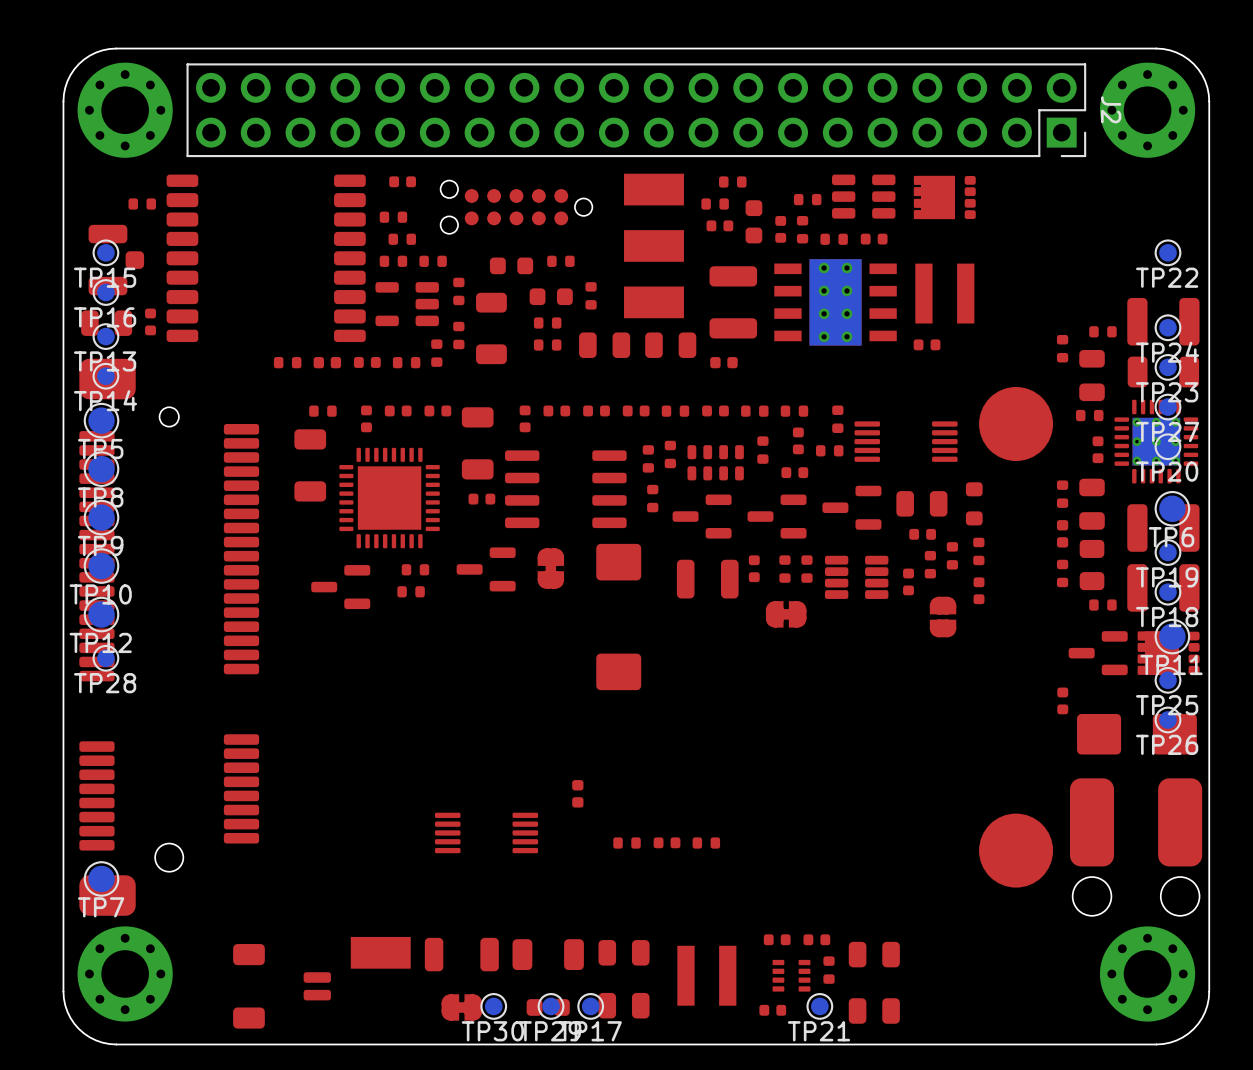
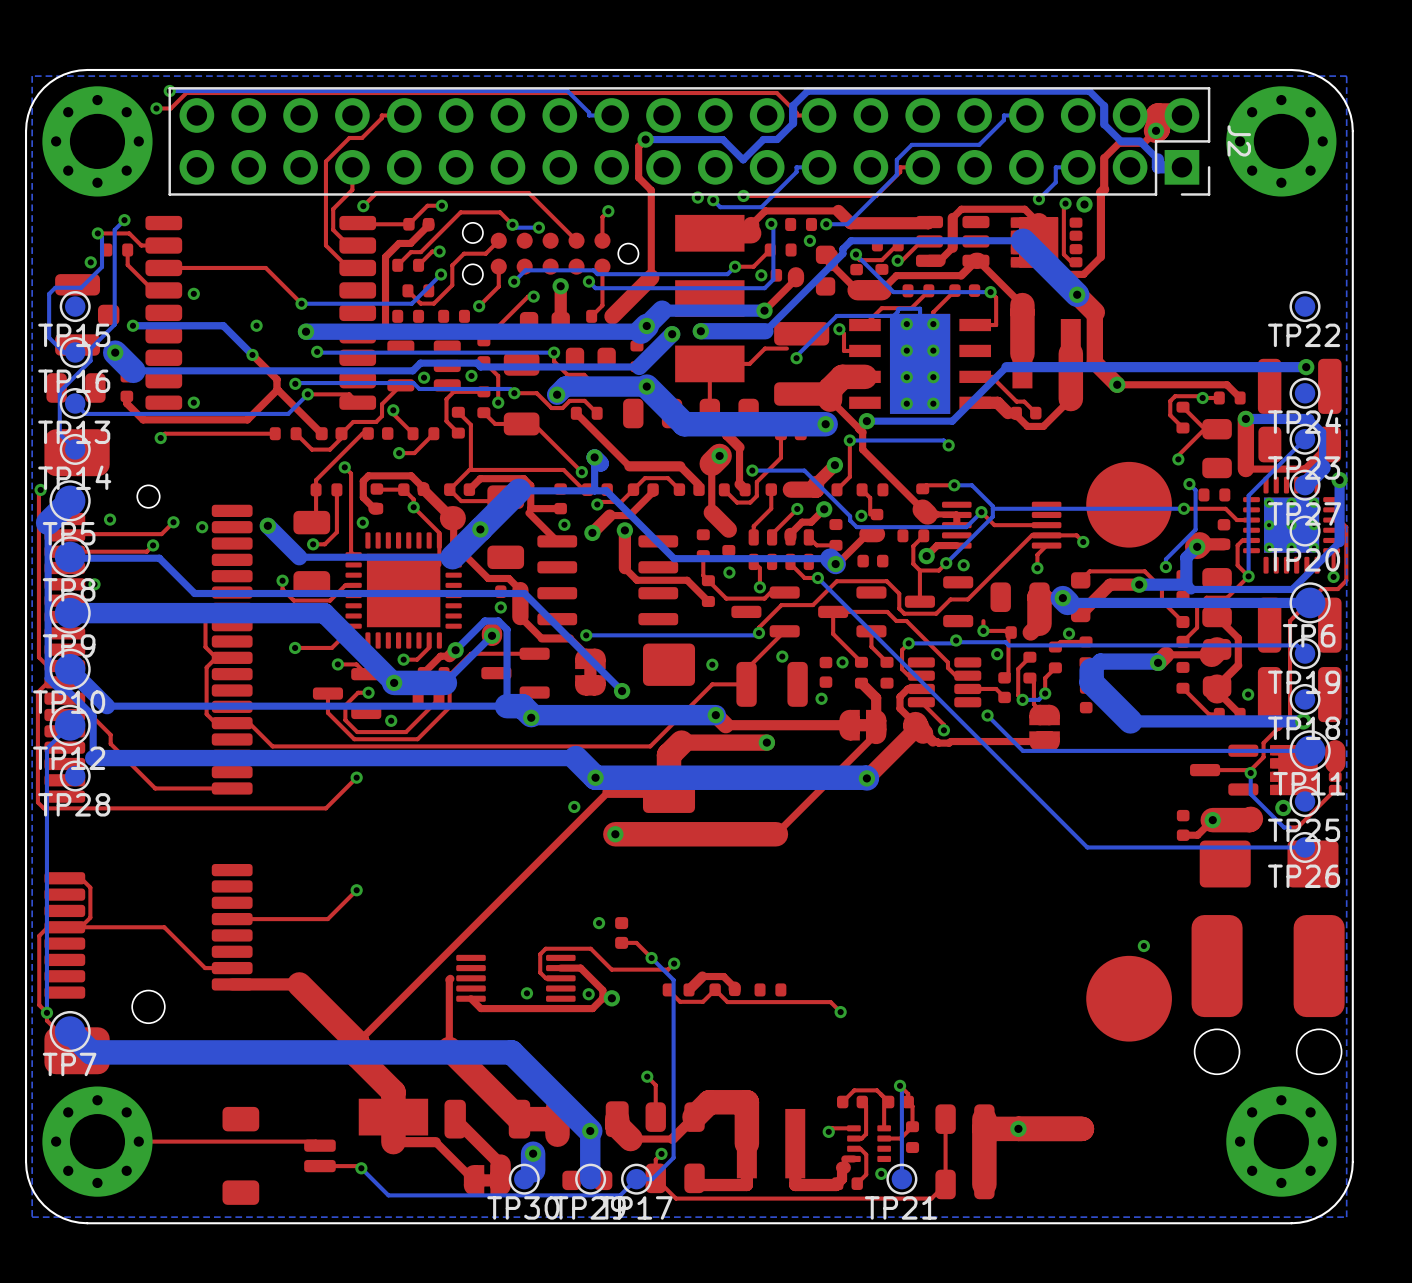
bottom zone outline: none -> (1346, 76) (32, 76) (32, 1217) (1346, 1217) (1346, 76)
bottom track: none -> (169, 91) (567, 91) (589, 112) (589, 115) (611, 115)
via: none -> (169, 91)
top track: none -> (156, 108) (170, 108) (186, 93) (776, 93) (796, 112) (796, 115) (819, 115)
via: none -> (156, 108)
top track: none -> (404, 115) (381, 115) (381, 118) (362, 137) (349, 137) (325, 161) (325, 245) (348, 267) (357, 267)
bottom track: none -> (1026, 115) (1003, 115) (1003, 120) (979, 144) (911, 144) (896, 159) (896, 174) (847, 224) (826, 224)
top track: none -> (1181, 115) (1157, 115) (1157, 128) (1143, 143) (1118, 143) (1104, 158) (1104, 189) (1100, 192) (1100, 257) (1083, 274) (1067, 274) (1038, 246) (1038, 223) (1024, 209) (961, 209) (952, 217) (952, 247) (939, 260) (929, 260)
via: none -> (1156, 130)
top track: none -> (645, 139) (638, 146) (638, 177) (651, 190) (651, 277) (612, 316)
bottom track: none -> (645, 139) (722, 139) (743, 159) (763, 139) (777, 139) (793, 123) (793, 105) (807, 91) (1089, 91) (1104, 105) (1104, 124) (1121, 141) (1139, 141) (1157, 159) (1157, 167) (1181, 167)
via: none -> (645, 139)
top track: none -> (352, 167) (352, 189) (333, 209) (333, 229) (348, 245) (357, 245)
bottom track: none -> (819, 167) (796, 167) (796, 172) (761, 207) (720, 207) (713, 200)
top track: none -> (922, 167) (900, 167) (900, 171) (876, 195) (743, 195)
bottom track: none -> (1078, 167) (1055, 167) (1055, 182) (1038, 199)
via: none -> (743, 195)
via: none -> (697, 197)
via: none -> (713, 200)
via: none -> (1038, 199)
top track: none -> (1065, 203) (1063, 205) (1063, 254) (1071, 262) (1076, 262)
via: none -> (1065, 203)
via: none -> (1084, 204)
top track: none -> (441, 205) (427, 205) (408, 224) (357, 223)
via: none -> (441, 205)
top track: none -> (363, 206) (376, 193) (528, 193) (576, 240)
via: none -> (363, 206)
top track: none -> (608, 211) (602, 217) (602, 240)
via: none -> (608, 211)
bottom track: none -> (124, 220) (114, 229) (114, 324) (90, 348) (90, 360) (59, 391) (59, 434) (75, 449)
via: none -> (124, 220)
top track: none -> (929, 222) (850, 223) (838, 210) (765, 210) (751, 225) (751, 233) (709, 233)
top track: none -> (428, 224) (410, 243) (399, 243) (385, 256) (385, 335)
bottom track: none -> (771, 223) (773, 225) (773, 279) (764, 288) (595, 288) (588, 281)
via: none -> (771, 223)
via: none -> (826, 224)
top track: none -> (512, 224) (500, 212) (460, 212) (420, 252) (410, 252) (397, 265)
bottom track: none -> (512, 224) (515, 227) (538, 227)
via: none -> (512, 224)
via: none -> (538, 227)
top track: none -> (97, 233) (129, 233) (141, 245) (163, 245)
bottom track: none -> (97, 233) (102, 237) (102, 267) (81, 287) (55, 287) (49, 293) (49, 337) (63, 352) (75, 352)
via: none -> (97, 233)
top track: none -> (498, 240) (485, 253) (464, 253) (452, 265) (452, 285) (433, 303) (420, 303) (407, 290)
via: none -> (809, 240)
top track: none -> (929, 241) (921, 241) (902, 260) (897, 260)
top track: none -> (898, 244) (881, 260) (859, 260) (855, 254)
top track: none -> (127, 250) (127, 264) (153, 290) (163, 290)
top track: none -> (770, 250) (753, 266) (735, 266)
top track: none -> (439, 251) (432, 251) (418, 265)
via: none -> (439, 251)
bottom track: none -> (855, 254) (893, 292) (990, 292)
via: none -> (855, 254)
top track: none -> (831, 254) (831, 265) (857, 290) (881, 290) (896, 275) (961, 275) (978, 260) (1022, 305) (1022, 353)
via: none -> (897, 260)
via: none -> (90, 262)
top track: none -> (498, 266) (498, 286) (479, 306)
top track: none -> (602, 266) (602, 305) (591, 316)
bottom track: none -> (735, 266) (727, 274) (597, 274) (593, 270) (525, 270) (514, 281)
via: none -> (735, 266)
top track: none -> (163, 267) (265, 267) (301, 303)
bottom track: none -> (441, 274) (411, 303) (301, 303)
via: none -> (441, 274)
via: none -> (761, 275)
top track: none -> (795, 275) (795, 279) (764, 310)
via: none -> (514, 281)
via: none -> (588, 281)
top track: none -> (560, 286) (560, 321)
via: none -> (560, 286)
top track: none -> (928, 290) (911, 308) (881, 308) (864, 325)
top track: none -> (954, 290) (933, 312) (933, 324)
top track: none -> (990, 292) (996, 297) (996, 325) (975, 325)
via: none -> (990, 292)
via: none -> (193, 293)
top track: none -> (1077, 294) (1094, 312) (1094, 362) (1117, 384) (1226, 384) (1240, 397)
bottom track: none -> (1077, 294) (1023, 240) (851, 240) (842, 248) (842, 253) (765, 331) (700, 331)
via: none -> (1077, 294)
top track: none -> (533, 296) (528, 296) (483, 340)
via: none -> (533, 296)
via: none -> (301, 303)
via: none -> (479, 306)
bottom track: none -> (764, 310) (662, 310) (641, 331) (306, 331)
via: none -> (764, 310)
bottom track: none -> (132, 325) (223, 325) (252, 354)
via: none -> (132, 325)
via: none -> (256, 325)
via: none -> (646, 325)
top track: none -> (839, 329) (844, 333) (844, 350) (864, 350)
via: none -> (839, 329)
via: none -> (306, 331)
via: none -> (700, 331)
bottom track: none -> (672, 334) (639, 366) (480, 366) (476, 363) (420, 363) (412, 370) (133, 370) (115, 352)
via: none -> (672, 334)
top track: none -> (786, 348) (765, 348) (749, 363) (709, 363) (709, 413)
bottom track: none -> (317, 351) (554, 352)
via: none -> (317, 351)
via: none -> (115, 352)
top track: none -> (554, 352) (554, 361) (567, 374) (584, 374) (597, 387)
via: none -> (554, 352)
top track: none -> (1070, 353) (1070, 399) (1043, 426) (1027, 426) (1016, 413) (1007, 413) (997, 402) (975, 402)
top track: none -> (252, 354) (276, 379) (276, 390)
via: none -> (252, 354)
bottom track: none -> (796, 358) (836, 315) (893, 315) (899, 308) (920, 308) (920, 363)
via: none -> (796, 358)
top track: none -> (483, 361) (498, 376) (498, 402)
bottom track: none -> (1306, 367) (1006, 367) (952, 421) (866, 421)
via: none -> (1306, 367)
via: none -> (471, 375)
top track: none -> (864, 376) (842, 376) (830, 389) (830, 399) (859, 428)
top track: none -> (975, 376) (996, 376) (996, 381) (1016, 401) (1024, 401) (1035, 413)
via: none -> (424, 377)
bottom track: none -> (295, 383) (413, 383) (419, 388) (510, 388) (514, 393)
via: none -> (295, 383)
top track: none -> (400, 385) (382, 404) (382, 416) (376, 421) (353, 421) (330, 449) (311, 449) (296, 433)
via: none -> (1117, 384)
via: none -> (646, 386)
top track: none -> (276, 390) (321, 433)
top track: none -> (276, 390) (247, 419) (143, 419) (126, 403) (126, 396)
top track: none -> (453, 391) (446, 399) (446, 421) (458, 433)
top track: none -> (483, 391) (453, 391)
top track: none -> (514, 393) (536, 393) (551, 408) (562, 408) (569, 400) (584, 400) (597, 413)
via: none -> (514, 393)
top track: none -> (307, 394) (349, 394) (357, 402)
bottom track: none -> (307, 394) (288, 413) (85, 413) (75, 403)
via: none -> (307, 394)
bottom track: none -> (557, 394) (565, 386) (646, 386) (684, 424) (825, 424)
via: none -> (557, 394)
via: none -> (1202, 397)
top track: none -> (1219, 397) (1175, 396) (1170, 401) (1170, 415) (1182, 428)
via: none -> (193, 402)
via: none -> (498, 402)
top track: none -> (1182, 407) (1204, 428)
top track: none -> (393, 410) (393, 413) (413, 433)
via: none -> (393, 410)
top track: none -> (458, 412) (470, 424) (470, 469)
top track: none -> (483, 412) (495, 423) (533, 423) (581, 472)
top track: none -> (576, 413) (629, 466) (680, 466) (699, 484)
top track: none -> (748, 413) (727, 434) (739, 447) (739, 484) (745, 489)
top track: none -> (1245, 418) (1245, 469) (1305, 469) (1329, 444)
bottom track: none -> (1245, 418) (1309, 418) (1322, 432) (1322, 467) (1305, 485)
via: none -> (1245, 418)
via: none -> (866, 421)
via: none -> (825, 424)
top track: none -> (859, 428) (862, 432) (862, 449) (927, 514) (956, 514) (956, 525)
top track: none -> (1217, 429) (1204, 429) (1176, 457) (1178, 459)
top track: none -> (275, 433) (165, 433) (160, 438)
top track: none -> (368, 433) (362, 433) (316, 480) (316, 518) (311, 522)
top track: none -> (433, 433) (414, 453) (399, 453)
top track: none -> (780, 433) (780, 457) (756, 482) (756, 496) (750, 502) (737, 502) (724, 489)
via: none -> (160, 438)
bottom track: none -> (1305, 439) (1248, 495) (1248, 576)
top track: none -> (849, 440) (849, 476) (836, 489)
bottom track: none -> (849, 440) (943, 440) (948, 445)
via: none -> (849, 440)
via: none -> (948, 445)
via: none -> (399, 453)
top track: none -> (719, 455) (711, 463) (711, 512) (728, 529)
via: none -> (719, 455)
via: none -> (594, 457)
via: none -> (1178, 459)
bottom track: none -> (600, 463) (594, 457) (594, 490)
top track: none -> (834, 465) (815, 484) (815, 489) (790, 489)
via: none -> (834, 465)
top track: none -> (344, 467) (351, 473) (351, 552) (353, 554)
via: none -> (344, 467)
bottom track: none -> (752, 470) (804, 470) (850, 516) (850, 520) (856, 527) (966, 527) (981, 512)
via: none -> (752, 470)
via: none -> (581, 472)
bottom track: none -> (1339, 479) (1339, 542) (1292, 589) (1191, 589) (1186, 584)
via: none -> (1339, 479)
bottom track: none -> (1189, 484) (1195, 490) (1195, 529) (1165, 559) (1165, 567)
via: none -> (1189, 484)
top track: none -> (954, 485) (926, 485) (922, 488)
bottom track: none -> (954, 485) (971, 485) (992, 506) (992, 516) (946, 563)
via: none -> (954, 485)
top track: none -> (376, 489) (403, 489) (413, 499) (413, 507) (439, 532) (439, 564)
top track: none -> (469, 489) (480, 478) (523, 478) (530, 485) (530, 508) (560, 508)
top track: none -> (583, 489) (563, 469) (469, 469) (449, 489) (461, 501) (501, 501) (505, 497)
top track: none -> (653, 489) (653, 492) (629, 515) (609, 515) (592, 532)
top track: none -> (679, 489) (667, 478) (644, 478) (621, 501) (599, 501) (597, 504)
top track: none -> (771, 489) (771, 508) (753, 526) (753, 537)
top track: none -> (40, 489) (38, 491) (38, 657) (47, 666) (64, 666)
via: none -> (40, 489)
top track: none -> (336, 489) (336, 532) (324, 544) (313, 544)
top track: none -> (862, 489) (870, 497) (870, 514)
bottom track: none -> (70, 500) (48, 522) (48, 678) (61, 691) (68, 691) (93, 716) (93, 758) (575, 758) (595, 777) (866, 778)
via: none -> (597, 504)
via: none -> (413, 507)
top track: none -> (376, 508) (374, 508) (363, 497) (363, 481) (368, 475) (411, 475) (453, 518) (453, 554) (464, 554) (488, 578) (508, 578) (520, 590) (520, 617) (541, 638) (570, 638) (590, 658)
top track: none -> (797, 508) (772, 534) (772, 537)
via: none -> (797, 508)
top track: none -> (824, 509) (811, 522) (802, 522) (790, 533) (790, 537)
via: none -> (824, 509)
top track: none -> (1183, 508) (1225, 508) (1236, 520) (1251, 520)
bottom track: none -> (1183, 508) (992, 508)
via: none -> (1183, 508)
top track: none -> (981, 512) (994, 525) (1046, 525)
via: none -> (981, 512)
top track: none -> (528, 513) (557, 541)
via: none -> (861, 515)
via: none -> (110, 519)
top track: none -> (1331, 520) (1339, 520) (1346, 527) (1346, 580) (1337, 589) (1321, 589) (1290, 620) (1290, 717) (1263, 742) (1263, 757) (1249, 771)
top track: none -> (173, 522) (161, 534) (64, 535)
via: none -> (173, 522)
via: none -> (362, 522)
via: none -> (564, 524)
bottom track: none -> (267, 525) (299, 557) (452, 557) (519, 490) (606, 490) (674, 558) (830, 558) (835, 564)
via: none -> (267, 525)
via: none -> (202, 527)
via: none -> (480, 529)
top track: none -> (624, 530) (624, 568) (636, 580) (687, 580) (708, 601)
via: none -> (624, 530)
via: none -> (592, 532)
top track: none -> (877, 534) (867, 534) (835, 564)
top track: none -> (923, 535) (913, 546) (913, 563) (919, 570)
top track: none -> (808, 537) (816, 545) (835, 545)
top track: none -> (1251, 540) (1242, 540) (1237, 545) (1237, 565) (1248, 576) (1227, 597) (1206, 597) (1197, 607) (1197, 627) (1182, 641)
top track: none -> (1083, 542) (1076, 535) (1031, 535) (967, 599) (950, 599) (936, 613) (904, 613) (899, 608) (899, 593) (886, 581) (836, 581) (812, 605) (781, 605) (759, 627) (759, 633)
via: none -> (1083, 542)
via: none -> (313, 544)
top track: none -> (1224, 544) (1199, 544) (1197, 546)
top track: none -> (153, 545) (146, 551) (64, 551)
via: none -> (153, 545)
top track: none -> (956, 545) (937, 545) (926, 556)
top track: none -> (1046, 545) (1037, 554) (1037, 568)
bottom track: none -> (1197, 546) (1186, 557) (1186, 584)
via: none -> (1197, 546)
top track: none -> (1331, 550) (1333, 552) (1333, 576)
top track: none -> (703, 555) (703, 575) (726, 598) (764, 598) (770, 592) (784, 592)
via: none -> (926, 556)
bottom track: none -> (70, 556) (159, 558) (194, 593) (524, 593) (622, 691)
top track: none -> (753, 561) (759, 568) (759, 587)
top track: none -> (790, 561) (804, 577) (817, 577)
top track: none -> (946, 563) (938, 570) (919, 570)
via: none -> (946, 563)
via: none -> (835, 564)
via: none -> (963, 565)
via: none -> (1165, 567)
via: none -> (1037, 568)
top track: none -> (919, 570) (919, 601)
via: none -> (729, 572)
via: none -> (1248, 576)
via: none -> (1333, 576)
bottom track: none -> (817, 577) (1087, 847) (1305, 847)
via: none -> (817, 577)
top track: none -> (282, 580) (282, 589) (293, 600) (330, 600) (345, 585) (353, 585)
via: none -> (282, 580)
top track: none -> (1080, 580) (1089, 571) (1144, 571) (1161, 588) (1161, 600) (1182, 622)
via: none -> (94, 584)
top track: none -> (1139, 584) (1110, 584) (1080, 614)
via: none -> (1139, 584)
bottom track: none -> (1186, 584) (1139, 584)
via: none -> (759, 587)
top track: none -> (1062, 598) (1039, 597) (1039, 623) (1030, 632)
bottom track: none -> (1062, 598) (1067, 602) (1310, 602)
via: none -> (1062, 598)
via: none -> (500, 607)
top track: none -> (232, 608) (215, 608) (205, 618) (205, 647) (216, 657)
bottom track: none -> (70, 613) (324, 613) (394, 682) (444, 682) (492, 635)
top track: none -> (1217, 617) (1238, 638) (1238, 665) (1217, 686) (1217, 691) (1240, 714)
top track: none -> (983, 621) (983, 630) (1005, 630) (1008, 634)
top track: none -> (353, 626) (331, 647) (295, 647)
via: none -> (983, 630)
top track: none -> (784, 631) (746, 669) (746, 684) (712, 684) (650, 746) (272, 746) (249, 723) (215, 723) (206, 714) (206, 667) (216, 657)
top track: none -> (871, 631) (871, 646) (887, 662)
bottom track: none -> (759, 633) (756, 635) (586, 635)
via: none -> (759, 633)
top track: none -> (492, 633) (492, 635)
top track: none -> (1008, 634) (1008, 673) (1004, 677)
via: none -> (1069, 633)
via: none -> (586, 635)
via: none -> (492, 635)
top track: none -> (429, 640) (429, 647) (417, 659) (403, 659)
via: none -> (956, 640)
top track: none -> (1086, 641) (1060, 641) (1055, 647)
top track: none -> (908, 643) (902, 650) (902, 669) (908, 675)
bottom track: none -> (908, 643) (953, 643) (956, 640) (957, 642) (1005, 642) (1008, 645) (1296, 645) (1305, 653)
via: none -> (908, 643)
via: none -> (295, 647)
top track: none -> (1217, 649) (1211, 654) (1166, 654) (1158, 662)
top track: none -> (455, 650) (449, 656) (440, 656) (423, 673)
bottom track: none -> (455, 650) (484, 620) (498, 620) (507, 629) (507, 706)
via: none -> (455, 650)
top track: none -> (534, 653) (470, 653) (451, 673) (444, 673)
via: none -> (997, 654)
via: none -> (782, 656)
top track: none -> (1029, 657) (1018, 668) (1018, 695) (1022, 699)
via: none -> (403, 659)
via: none -> (842, 662)
top track: none -> (861, 662) (833, 634) (833, 611) (887, 611) (896, 620) (906, 620) (947, 662) (947, 667) (955, 675) (967, 675)
bottom track: none -> (1158, 662) (1100, 661) (1091, 670) (1091, 682) (1130, 721) (1303, 721)
via: none -> (1158, 662)
top track: none -> (337, 664) (356, 664) (366, 674)
via: none -> (337, 664)
via: none -> (712, 664)
top track: none -> (1055, 667) (1045, 678) (1045, 693)
bottom track: none -> (70, 669) (107, 706) (507, 706)
top track: none -> (449, 673) (449, 707) (417, 739) (354, 739) (327, 712) (327, 693)
top track: none -> (1029, 678) (1033, 682) (1033, 704) (1044, 714)
top track: none -> (64, 682) (47, 682) (37, 692) (37, 802) (43, 808) (325, 808) (356, 777)
via: none -> (394, 682)
top track: none -> (861, 683) (876, 697) (876, 733) (775, 834) (615, 834)
top track: none -> (1182, 688) (1209, 714) (1219, 714)
top track: none -> (921, 688) (907, 688) (899, 696) (899, 708) (917, 727)
top track: none -> (967, 688) (996, 688) (1004, 697)
via: none -> (622, 691)
top track: none -> (368, 692) (358, 692) (345, 705) (345, 720) (357, 732) (405, 732) (438, 699)
via: none -> (368, 692)
bottom track: none -> (1045, 693) (1038, 699) (1022, 699)
via: none -> (1045, 693)
via: none -> (1248, 694)
via: none -> (821, 698)
via: none -> (1022, 699)
top track: none -> (921, 702) (943, 724) (943, 730)
bottom track: none -> (507, 706) (522, 706) (531, 715) (715, 715)
top track: none -> (90, 714) (110, 734) (110, 743) (155, 788) (232, 788)
top track: none -> (715, 715) (725, 725) (849, 725)
via: none -> (715, 715)
bottom track: none -> (987, 715) (1022, 750) (1310, 750)
via: none -> (987, 715)
via: none -> (531, 717)
via: none -> (391, 720)
via: none -> (1303, 721)
bottom track: none -> (70, 725) (46, 748) (46, 1012)
top track: none -> (917, 727) (932, 741) (938, 743) (1044, 741)
top track: none -> (917, 727) (866, 778)
via: none -> (943, 730)
top track: none -> (766, 742) (681, 742) (669, 755) (669, 791) (608, 791) (357, 1042)
via: none -> (766, 742)
top track: none -> (1335, 750) (1335, 776)
top track: none -> (1205, 770) (1247, 770) (1250, 773)
bottom track: none -> (1250, 773) (1250, 794) (1284, 827) (1289, 827)
via: none -> (1250, 773)
via: none -> (356, 777)
via: none -> (595, 777)
via: none -> (866, 778)
top track: none -> (1335, 789) (1297, 827) (1289, 827)
via: none -> (574, 806)
via: none -> (1283, 807)
top track: none -> (1250, 818) (1212, 820) (1197, 835) (1183, 835)
via: none -> (1212, 820)
via: none -> (615, 834)
top track: none -> (64, 878) (81, 878) (90, 887) (90, 917) (80, 927)
top track: none -> (356, 890) (327, 919) (232, 919)
via: none -> (356, 890)
via: none -> (599, 923)
top track: none -> (621, 942) (636, 942) (651, 958)
via: none -> (1143, 946)
bottom track: none -> (651, 958) (673, 980) (673, 1157) (652, 1179) (636, 1179) (620, 1195) (388, 1195) (361, 1168)
via: none -> (651, 958)
top track: none -> (674, 963) (668, 969) (611, 969) (590, 948) (545, 948) (540, 954) (540, 972) (545, 978) (560, 978)
via: none -> (674, 963)
top track: none -> (232, 968) (205, 968) (164, 927) (47, 927) (39, 935) (39, 1005) (46, 1012) (46, 1020) (77, 1050)
top track: none -> (560, 968) (580, 968) (602, 990) (602, 998)
top track: none -> (450, 978) (449, 1048) (519, 1119) (557, 1119) (557, 1134)
top track: none -> (232, 984) (299, 984) (357, 1042)
top track: none -> (734, 989) (723, 976) (702, 976) (689, 989)
top track: none -> (668, 989) (680, 1001) (703, 1001) (715, 989) (727, 1002) (830, 1002) (840, 1012)
via: none -> (526, 993)
via: none -> (588, 994)
top track: none -> (602, 998) (592, 1008) (480, 1008) (471, 998)
via: none -> (611, 998)
via: none -> (46, 1012)
via: none -> (840, 1012)
bottom track: none -> (70, 1031) (90, 1052) (511, 1052) (590, 1131) (590, 1179)
top track: none -> (357, 1042) (357, 1056) (393, 1092) (393, 1142) (435, 1142) (474, 1180)
top track: none -> (647, 1076) (655, 1085) (655, 1117)
via: none -> (647, 1076)
top track: none -> (900, 1085) (908, 1094) (908, 1102) (912, 1106) (912, 1126) (900, 1138) (884, 1138)
bottom track: none -> (900, 1085) (901, 1087) (901, 1179)
via: none -> (900, 1085)
top track: none -> (884, 1097) (884, 1128)
top track: none -> (862, 1102) (866, 1105) (866, 1134) (861, 1138) (853, 1138)
top track: none -> (888, 1102) (877, 1090) (854, 1090) (842, 1102)
top track: none -> (455, 1119) (500, 1164) (500, 1180)
top track: none -> (617, 1119) (617, 1125) (630, 1139) (672, 1139) (709, 1102) (746, 1102) (746, 1185) (701, 1185) (694, 1178)
top track: none -> (945, 1119) (945, 1184) (931, 1198) (675, 1198) (655, 1178) (655, 1159) (661, 1153)
top track: none -> (984, 1119) (984, 1184)
top track: none -> (853, 1128) (832, 1128) (828, 1131)
via: none -> (1018, 1128)
top track: none -> (1081, 1128) (984, 1128)
via: none -> (590, 1131)
via: none -> (828, 1131)
top track: none -> (138, 1141) (315, 1141) (319, 1145)
top track: none -> (795, 1143) (795, 1185) (836, 1185) (842, 1179) (842, 1167) (844, 1167) (844, 1158) (853, 1158)
top track: none -> (853, 1148) (860, 1148) (866, 1154) (866, 1174) (857, 1183)
bottom track: none -> (533, 1153) (533, 1170) (524, 1179)
via: none -> (533, 1153)
via: none -> (661, 1153)
top track: none -> (319, 1166) (359, 1166) (361, 1168)
via: none -> (361, 1168)
via: none -> (881, 1173)

